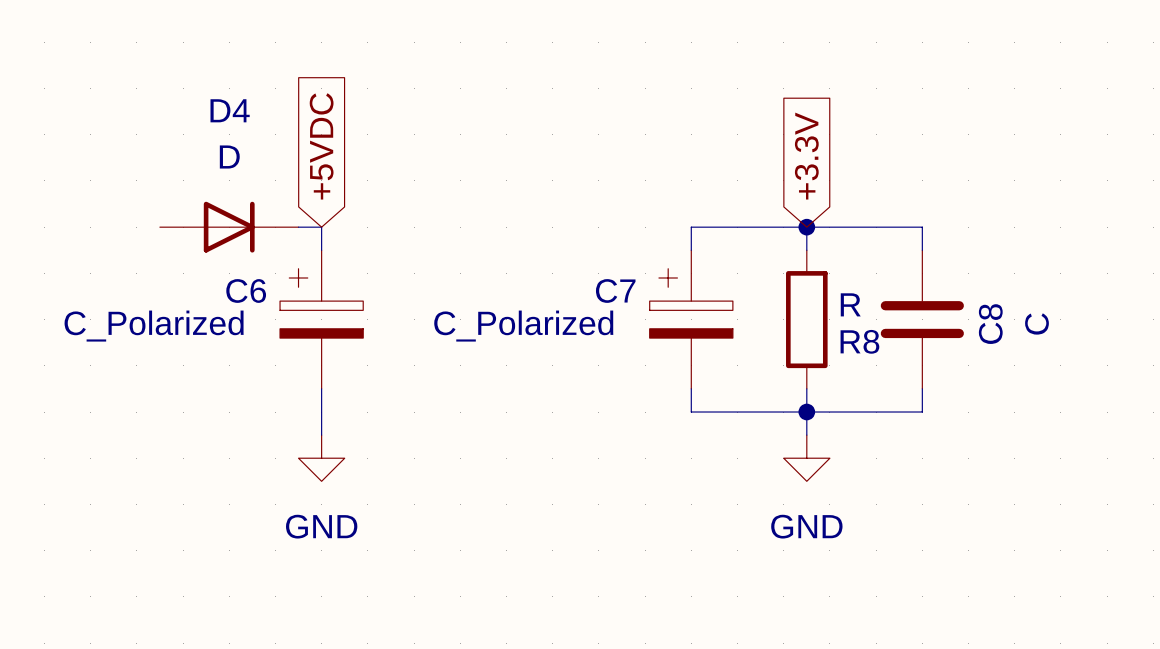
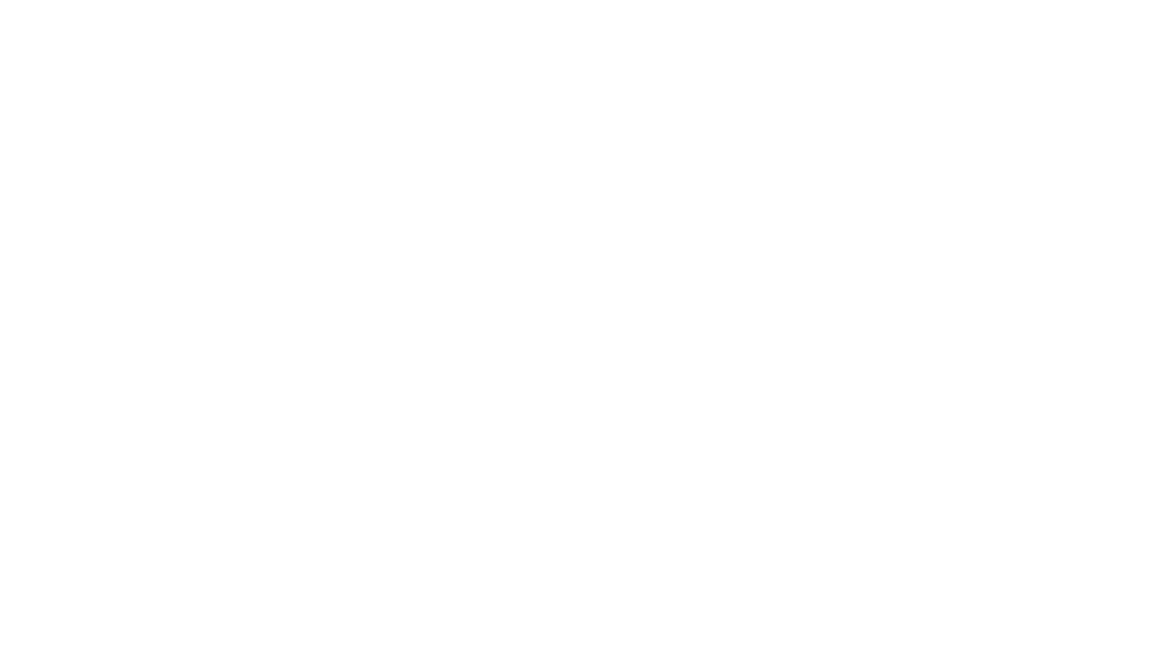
global label: +5VDC (321, 146) -> none
global label: +3.3V (806, 156) -> none
D4: D (229, 227) -> none
wire: (298, 227) (321, 227) (321, 250) -> none
wire: (806, 227) (806, 250) -> none
junction: (806, 227) -> none
wire: (691, 250) (691, 227) (922, 227) (922, 250) -> none
C6: C_Polarized (321, 319) -> none
C7: C_Polarized (691, 319) -> none
R8: R (806, 319) -> none
C8: C (922, 319) -> none
wire: (321, 388) (321, 435) -> none
wire: (691, 388) (691, 412) (922, 412) (922, 388) -> none
wire: (806, 388) (806, 435) -> none
junction: (806, 412) -> none
power symbol: GND (321, 458) -> none
power symbol: GND (806, 458) -> none

